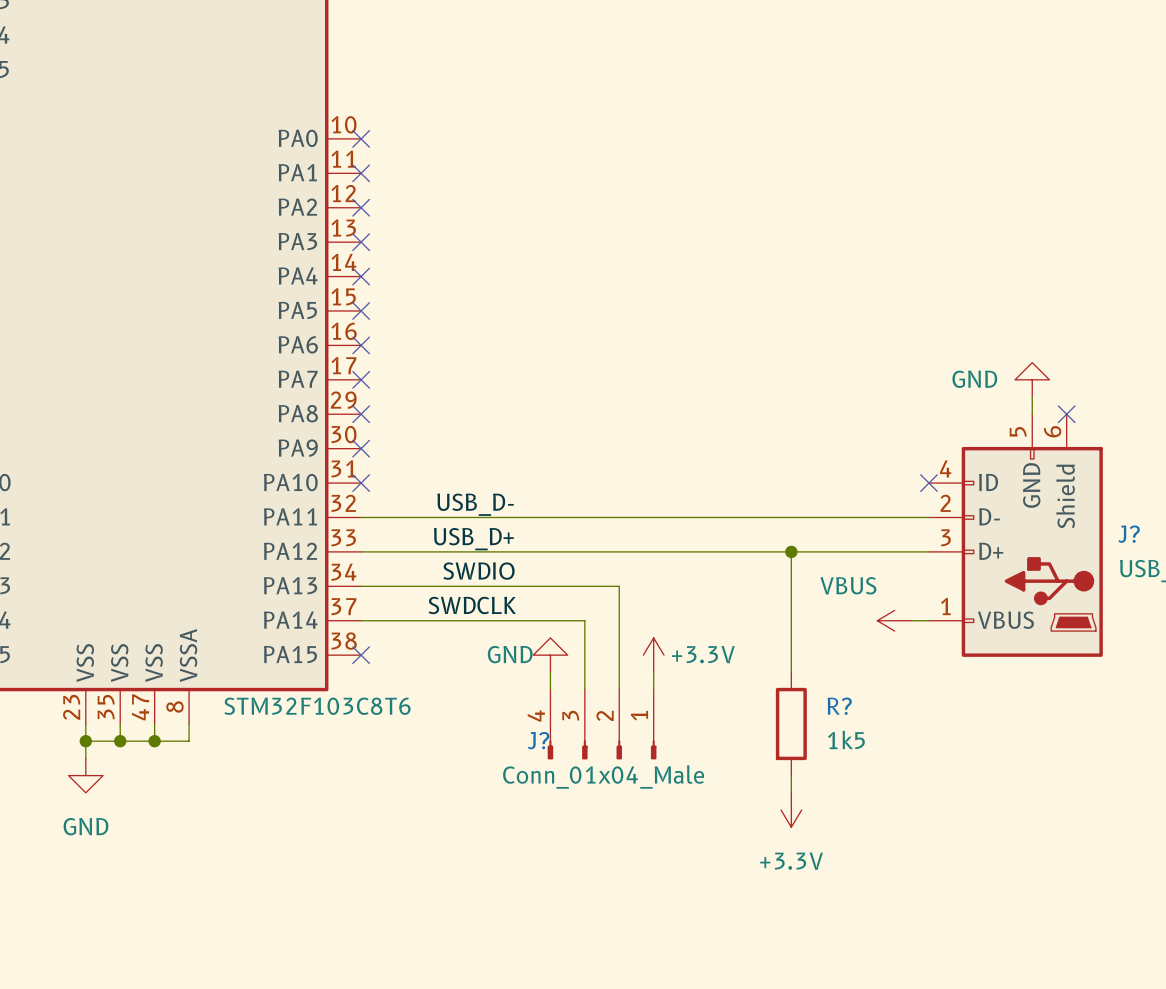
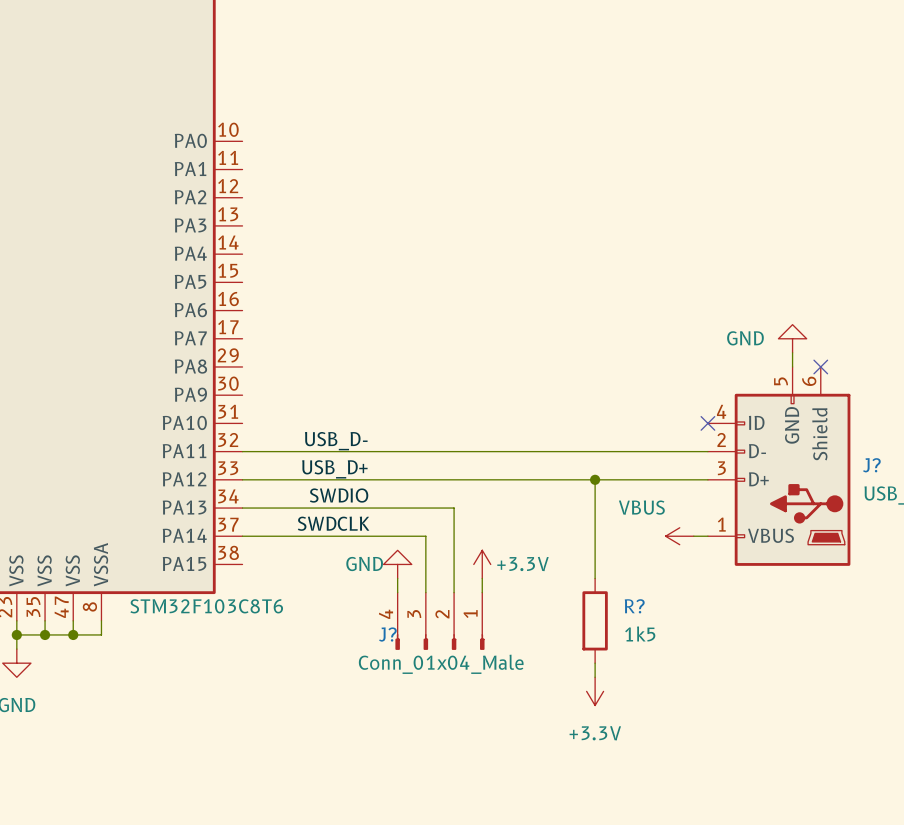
no-connect mark: (361, 138) -> none
no-connect mark: (361, 173) -> none
no-connect mark: (361, 207) -> none
no-connect mark: (361, 242) -> none
no-connect mark: (361, 276) -> none
no-connect mark: (361, 310) -> none
no-connect mark: (361, 345) -> none
no-connect mark: (361, 379) -> none
no-connect mark: (361, 414) -> none
no-connect mark: (361, 448) -> none
no-connect mark: (361, 483) -> none
no-connect mark: (361, 655) -> none

